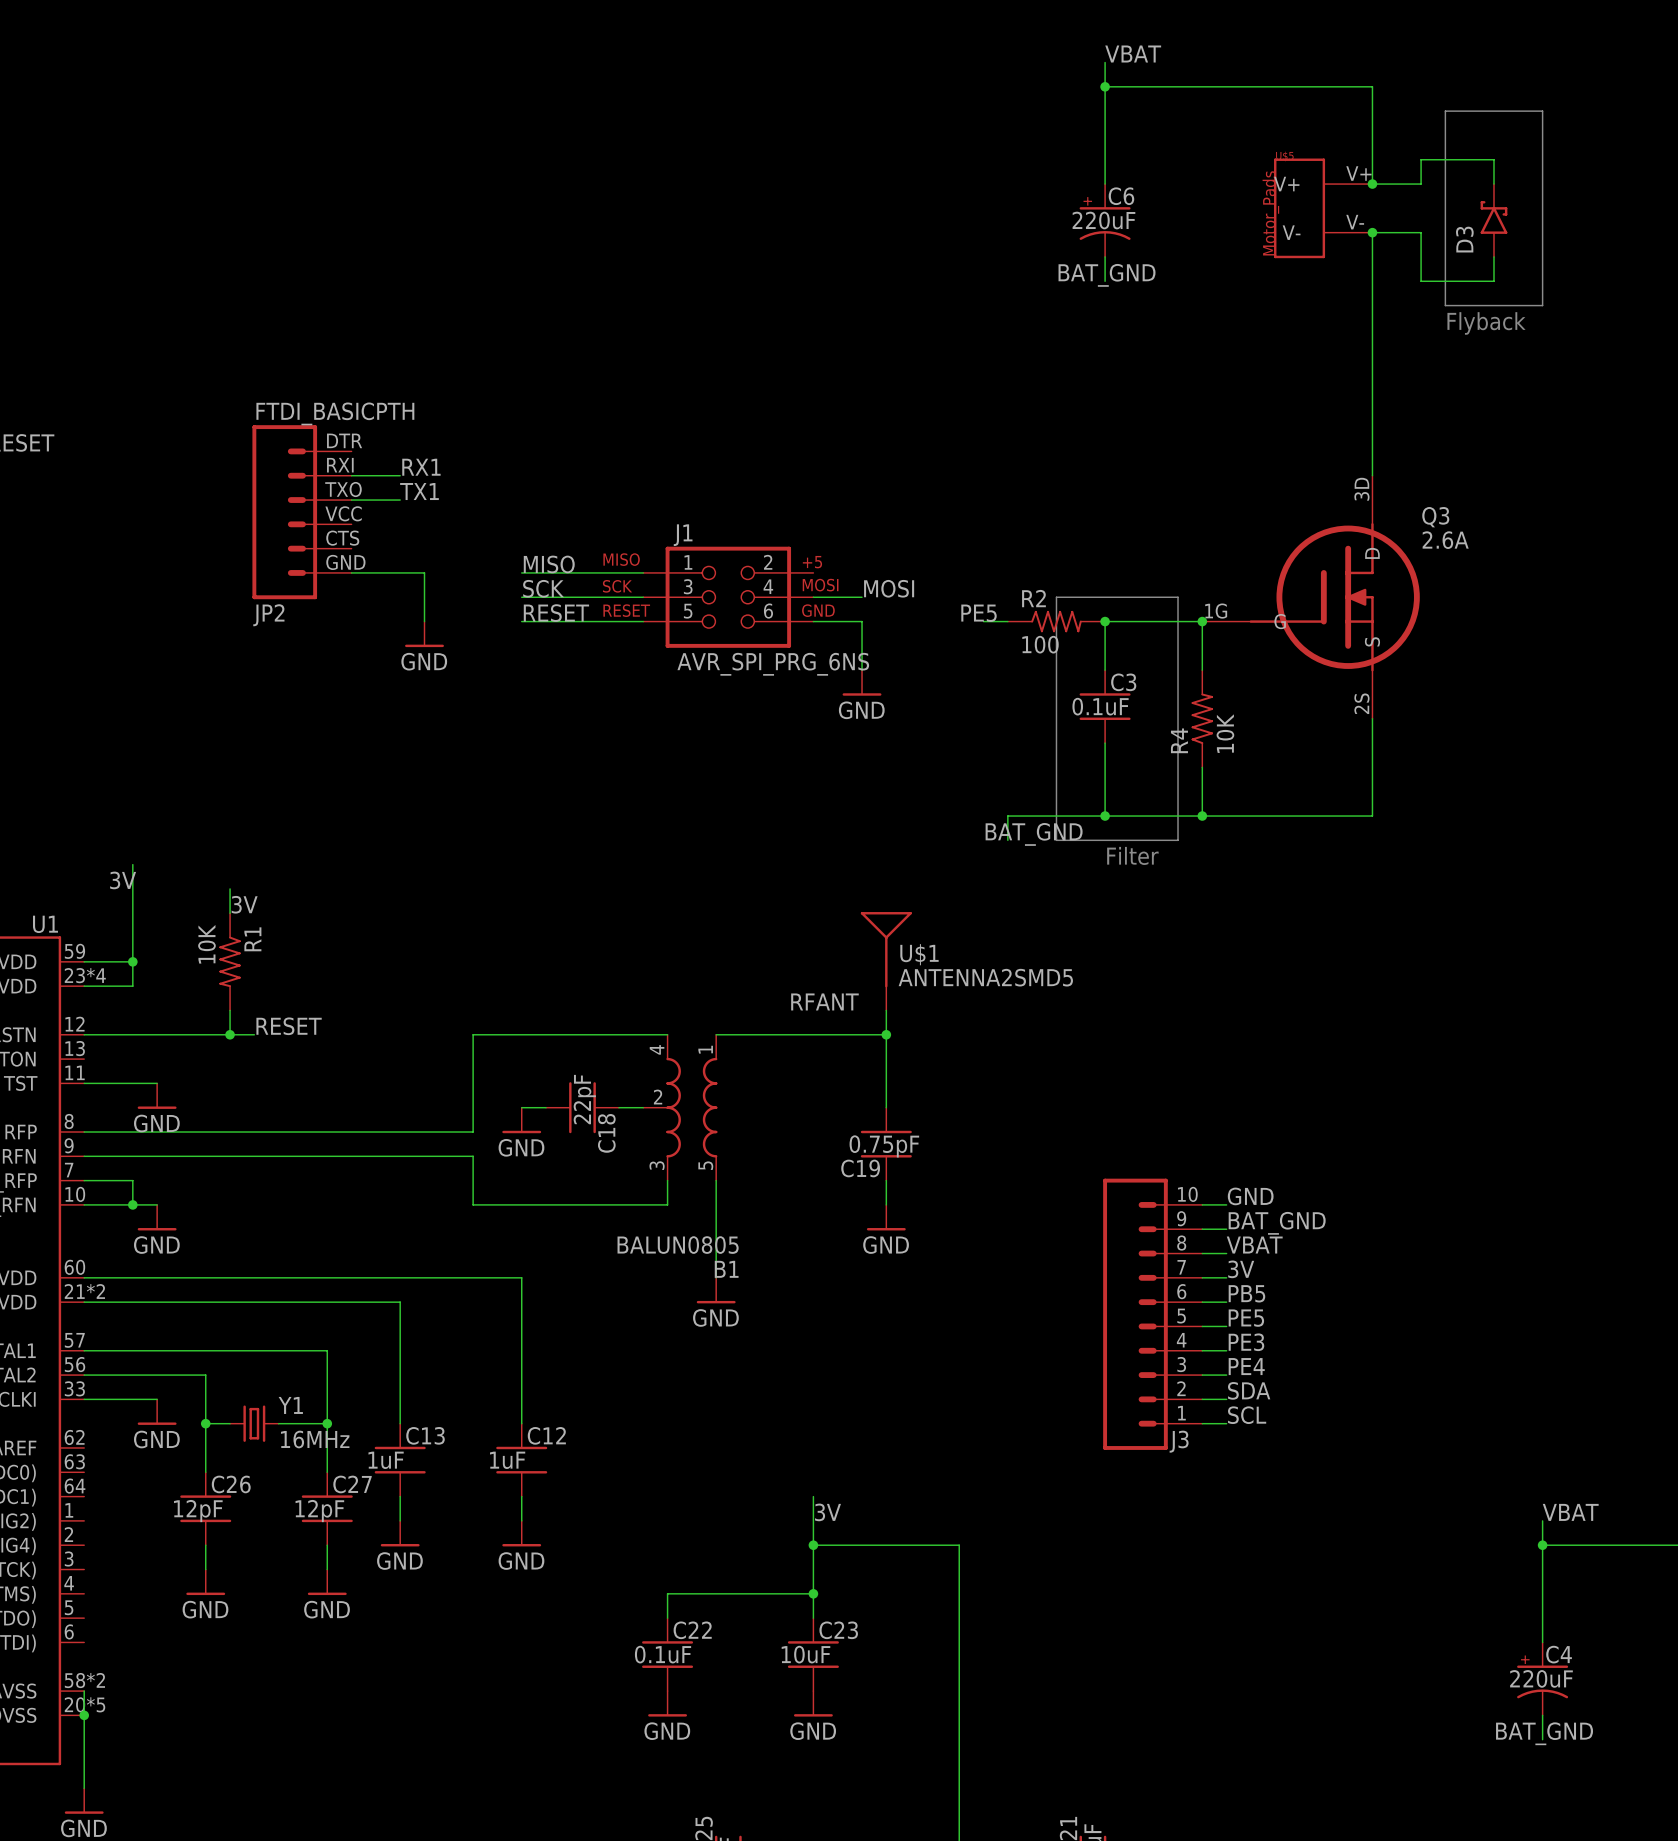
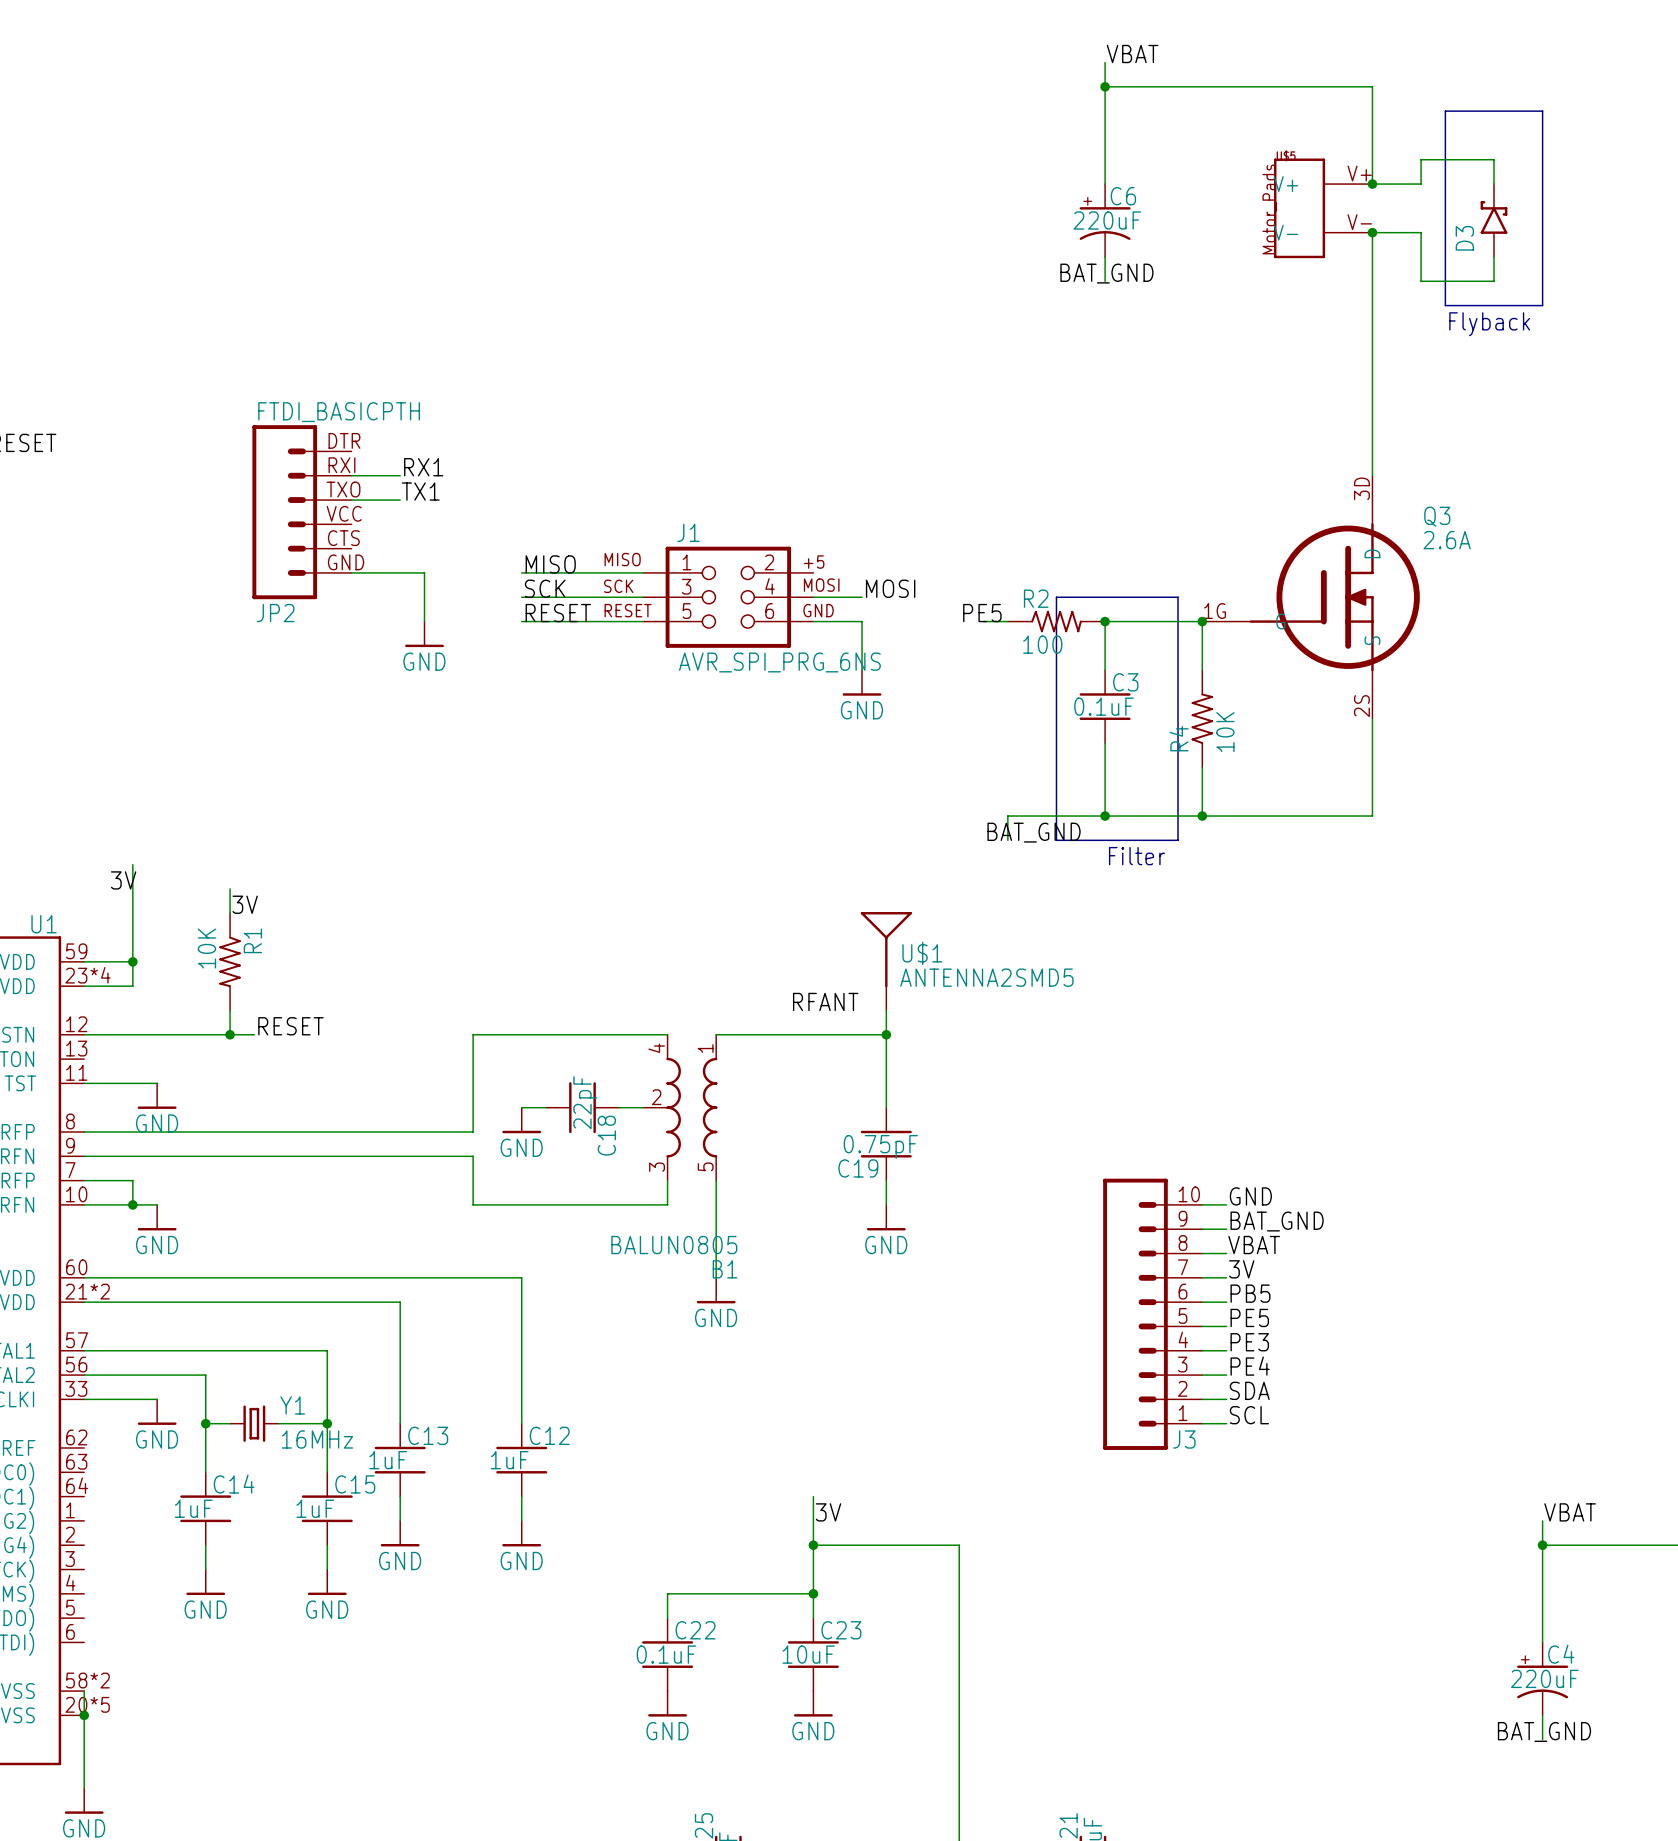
C26 name: C26 (231, 1484) -> C14 (234, 1484)
C27 name: C27 (352, 1484) -> C15 (355, 1484)
C26 value: 12pF (198, 1511) -> 1uF (193, 1508)
C27 value: 12pF (319, 1511) -> 1uF (315, 1508)

